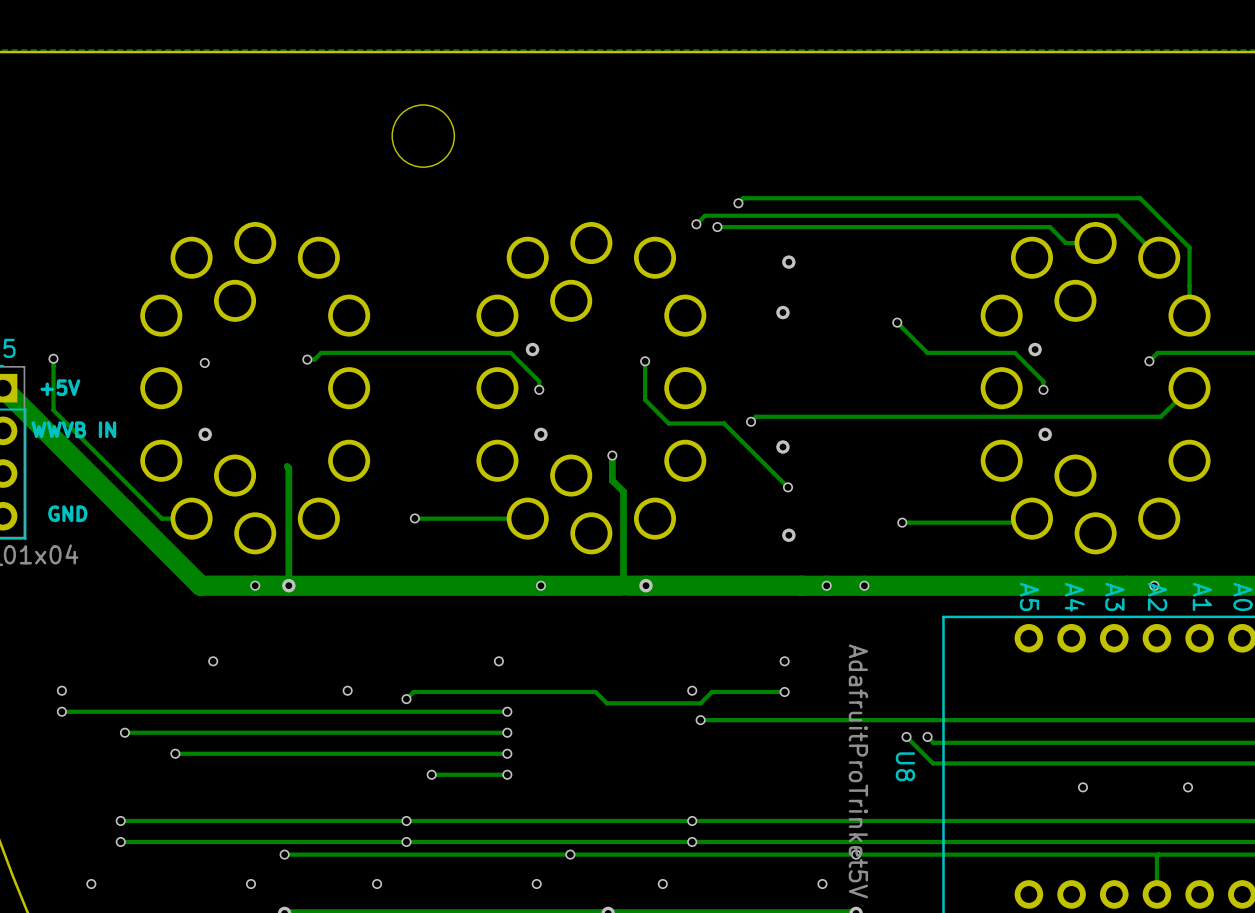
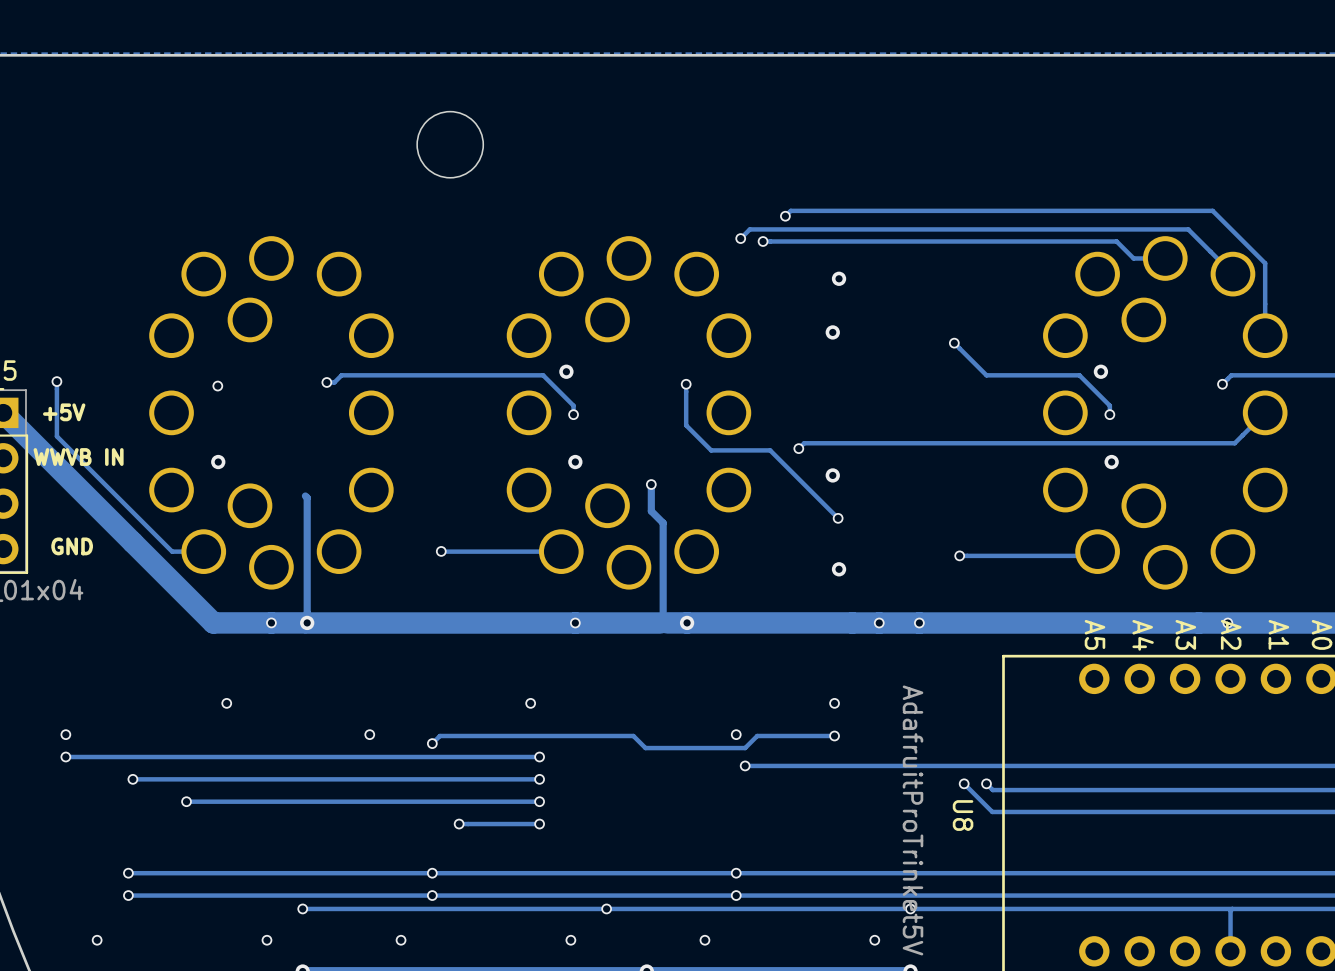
via: (1083, 787) -> none
via: (1188, 787) -> none

